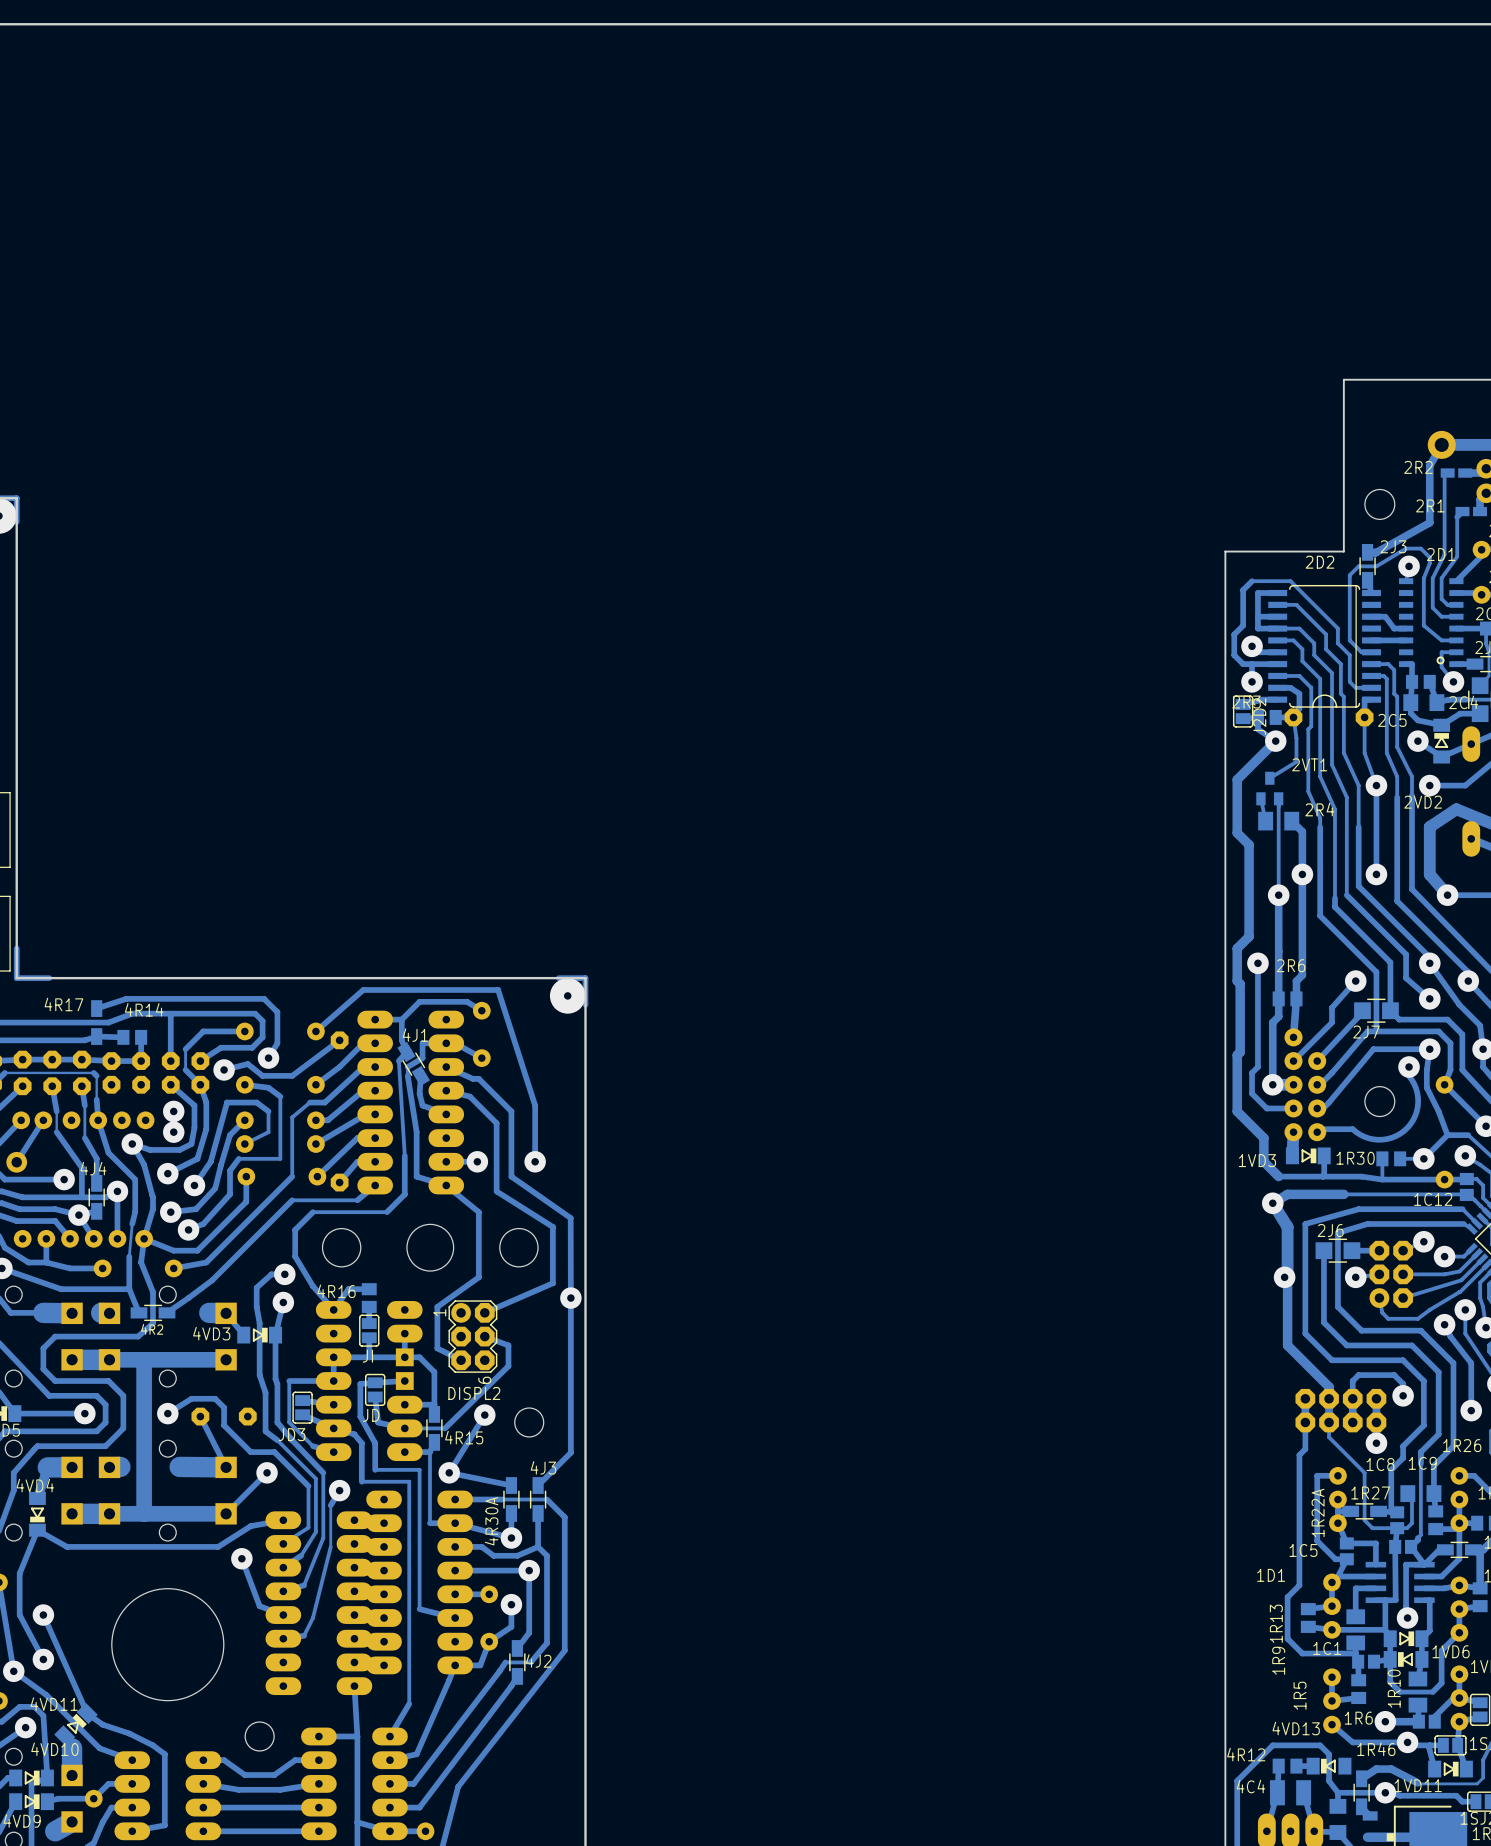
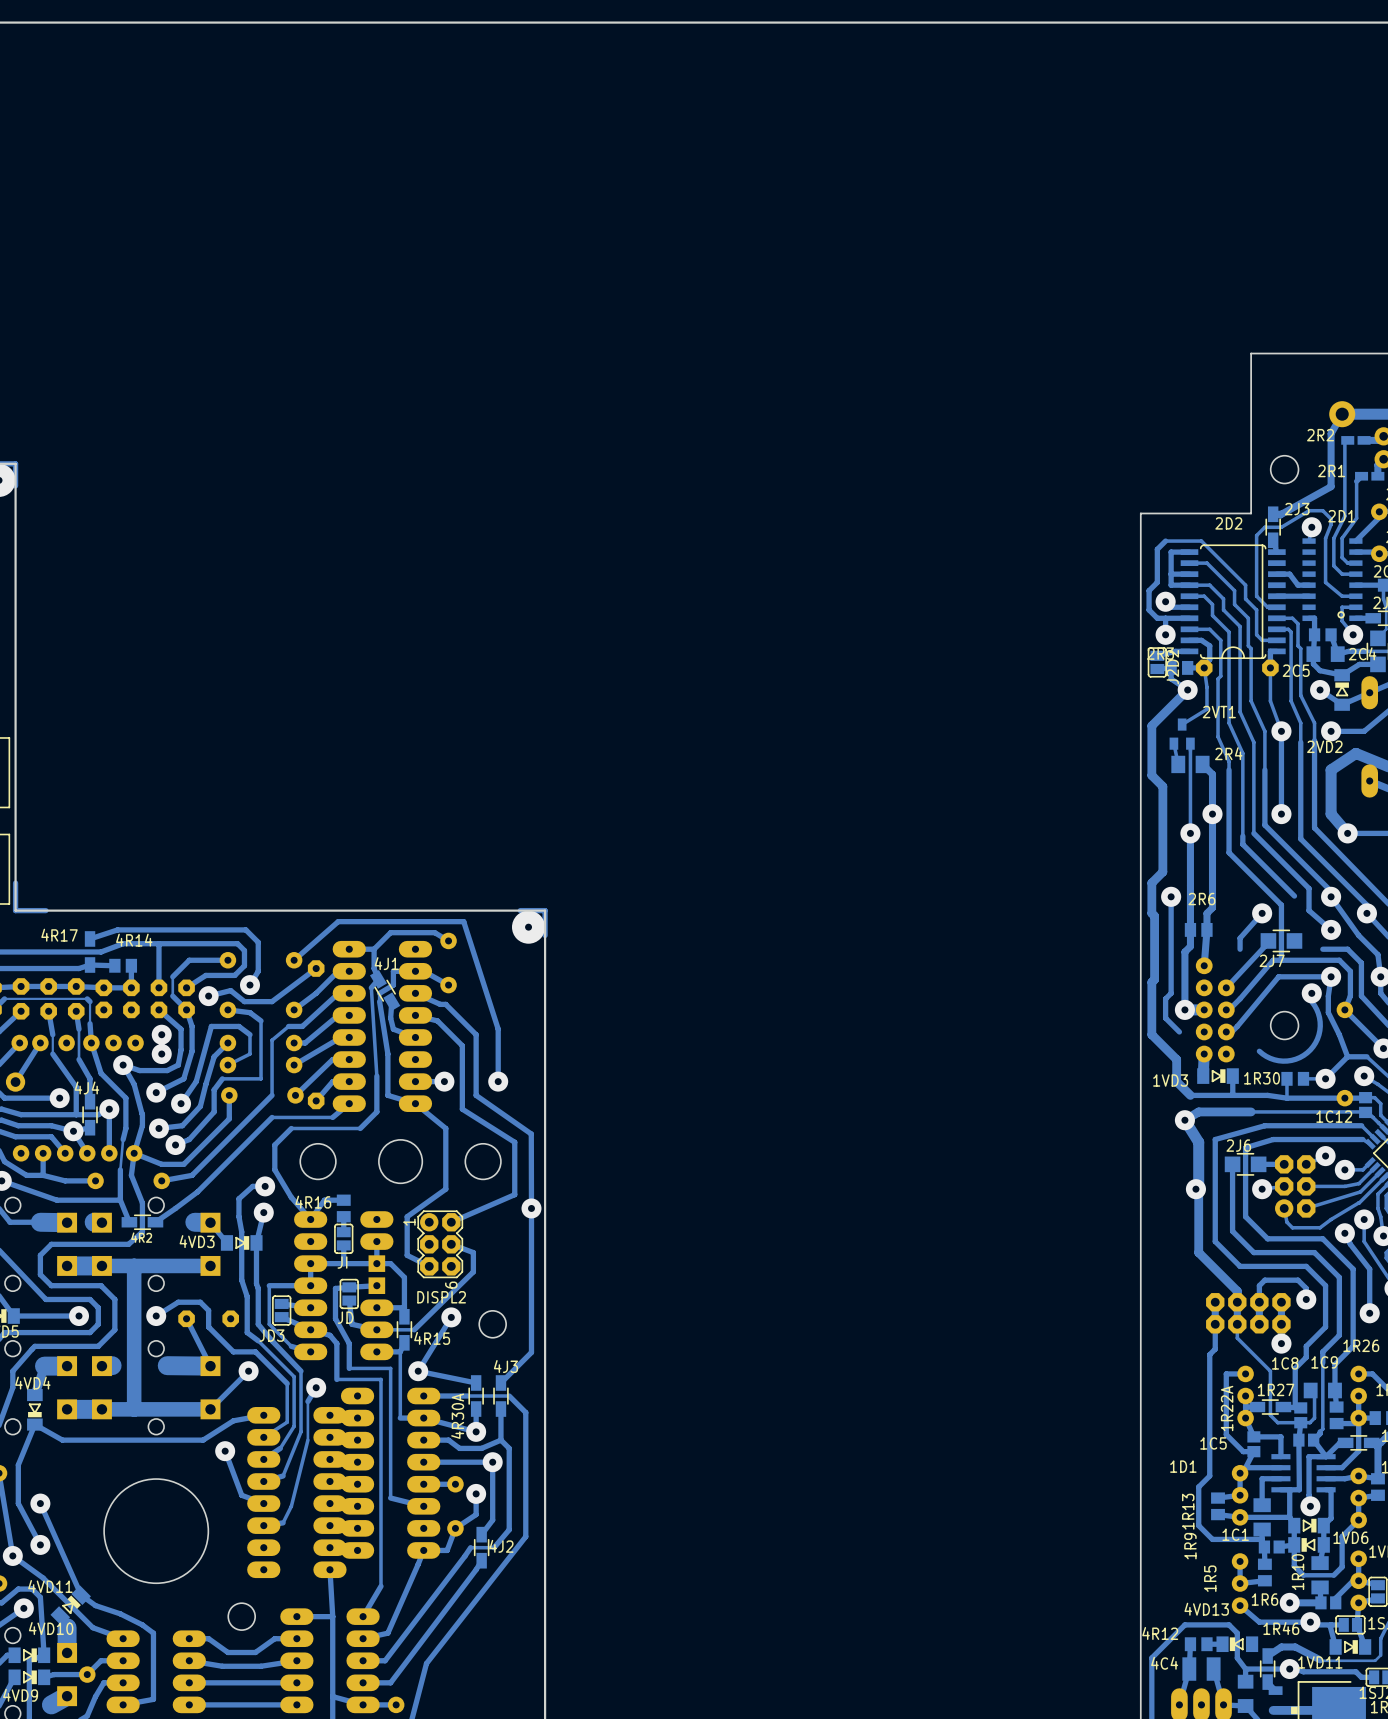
track: (1390, 962) (1390, 1010) (1399, 1019) (1420, 1019) -> none
track: (1332, 1019) (1332, 1022) (1293, 1061) -> none
track: (1293, 1108) (1266, 1108) -> none
track: (1352, 1129) (1320, 1129) (1317, 1132) -> none

